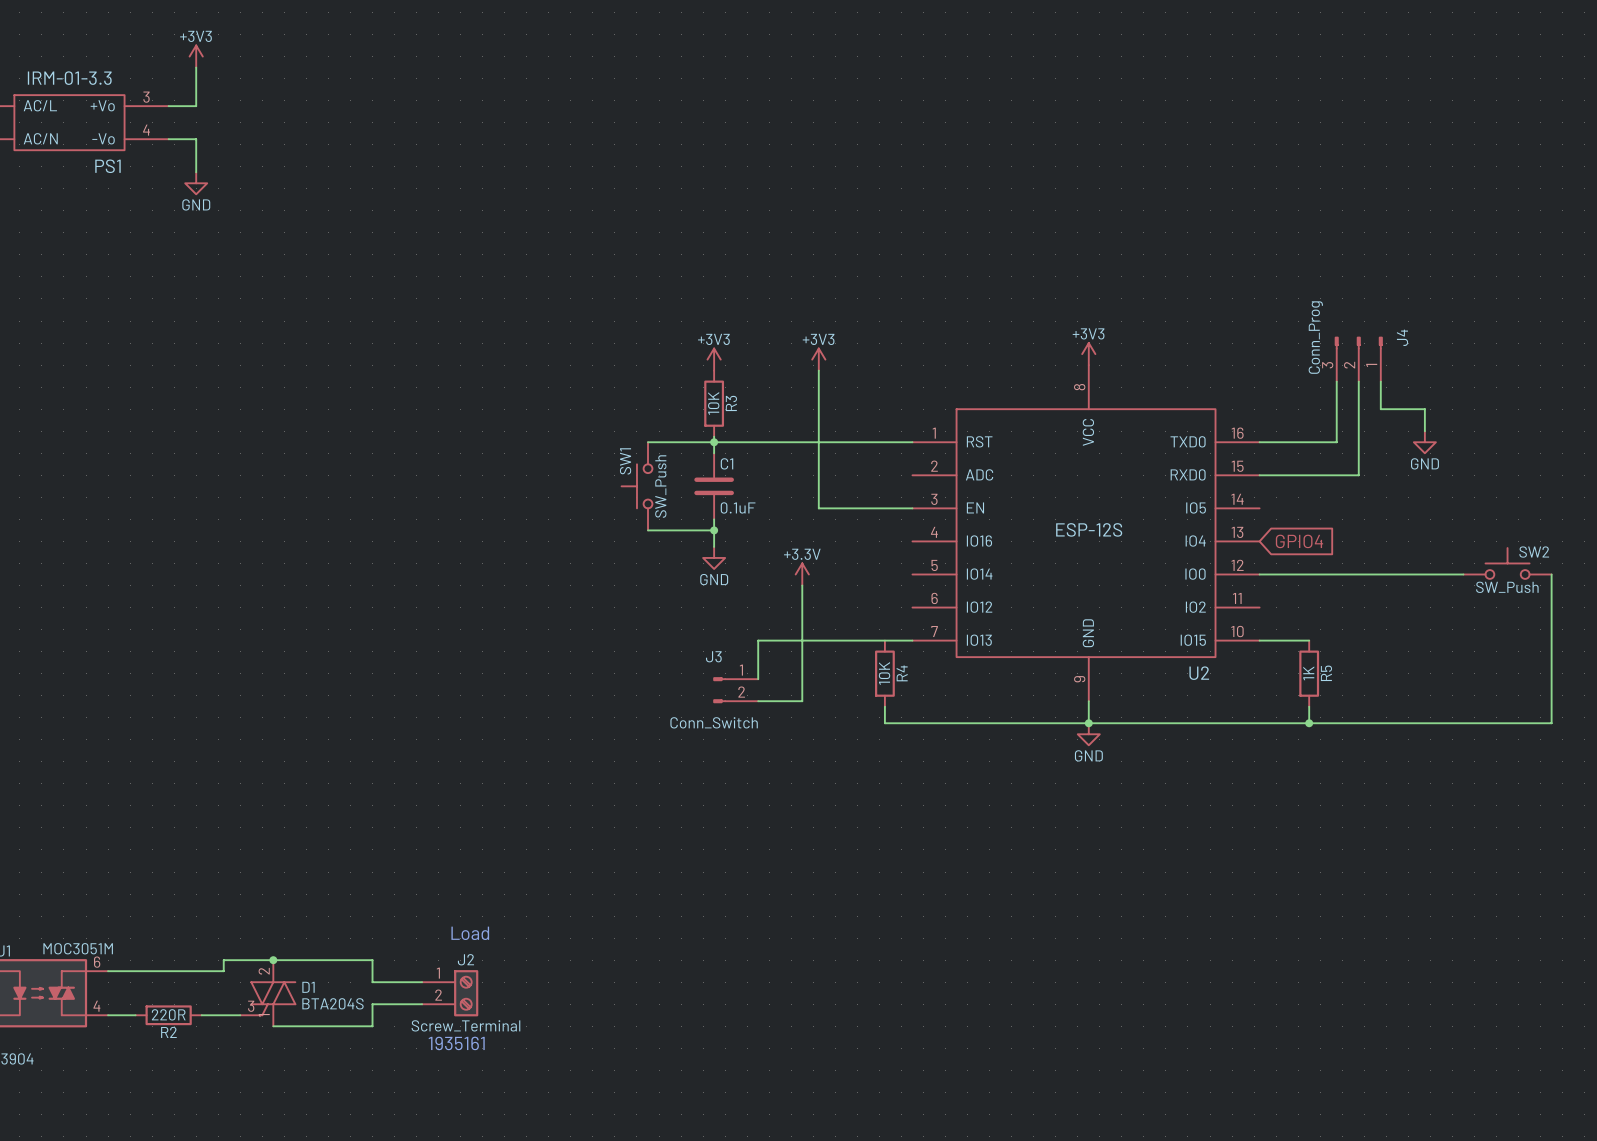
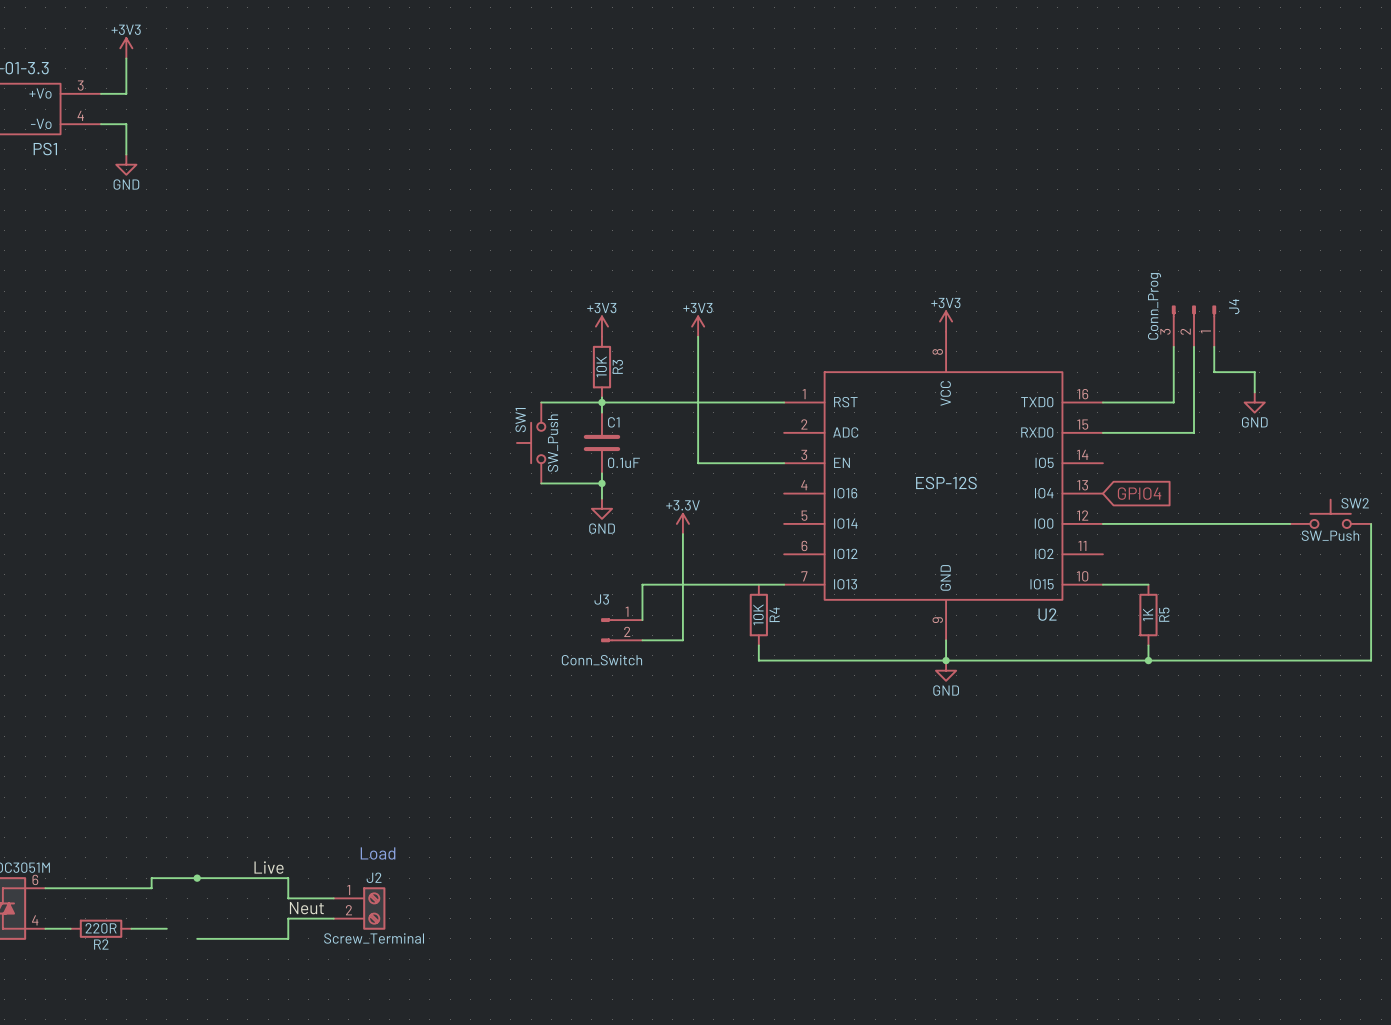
label: none -> Live (269, 867)
label: none -> Neut (306, 908)
D1: BTA204S (268, 993) -> none
text: 1935161 (456, 1043) -> none

